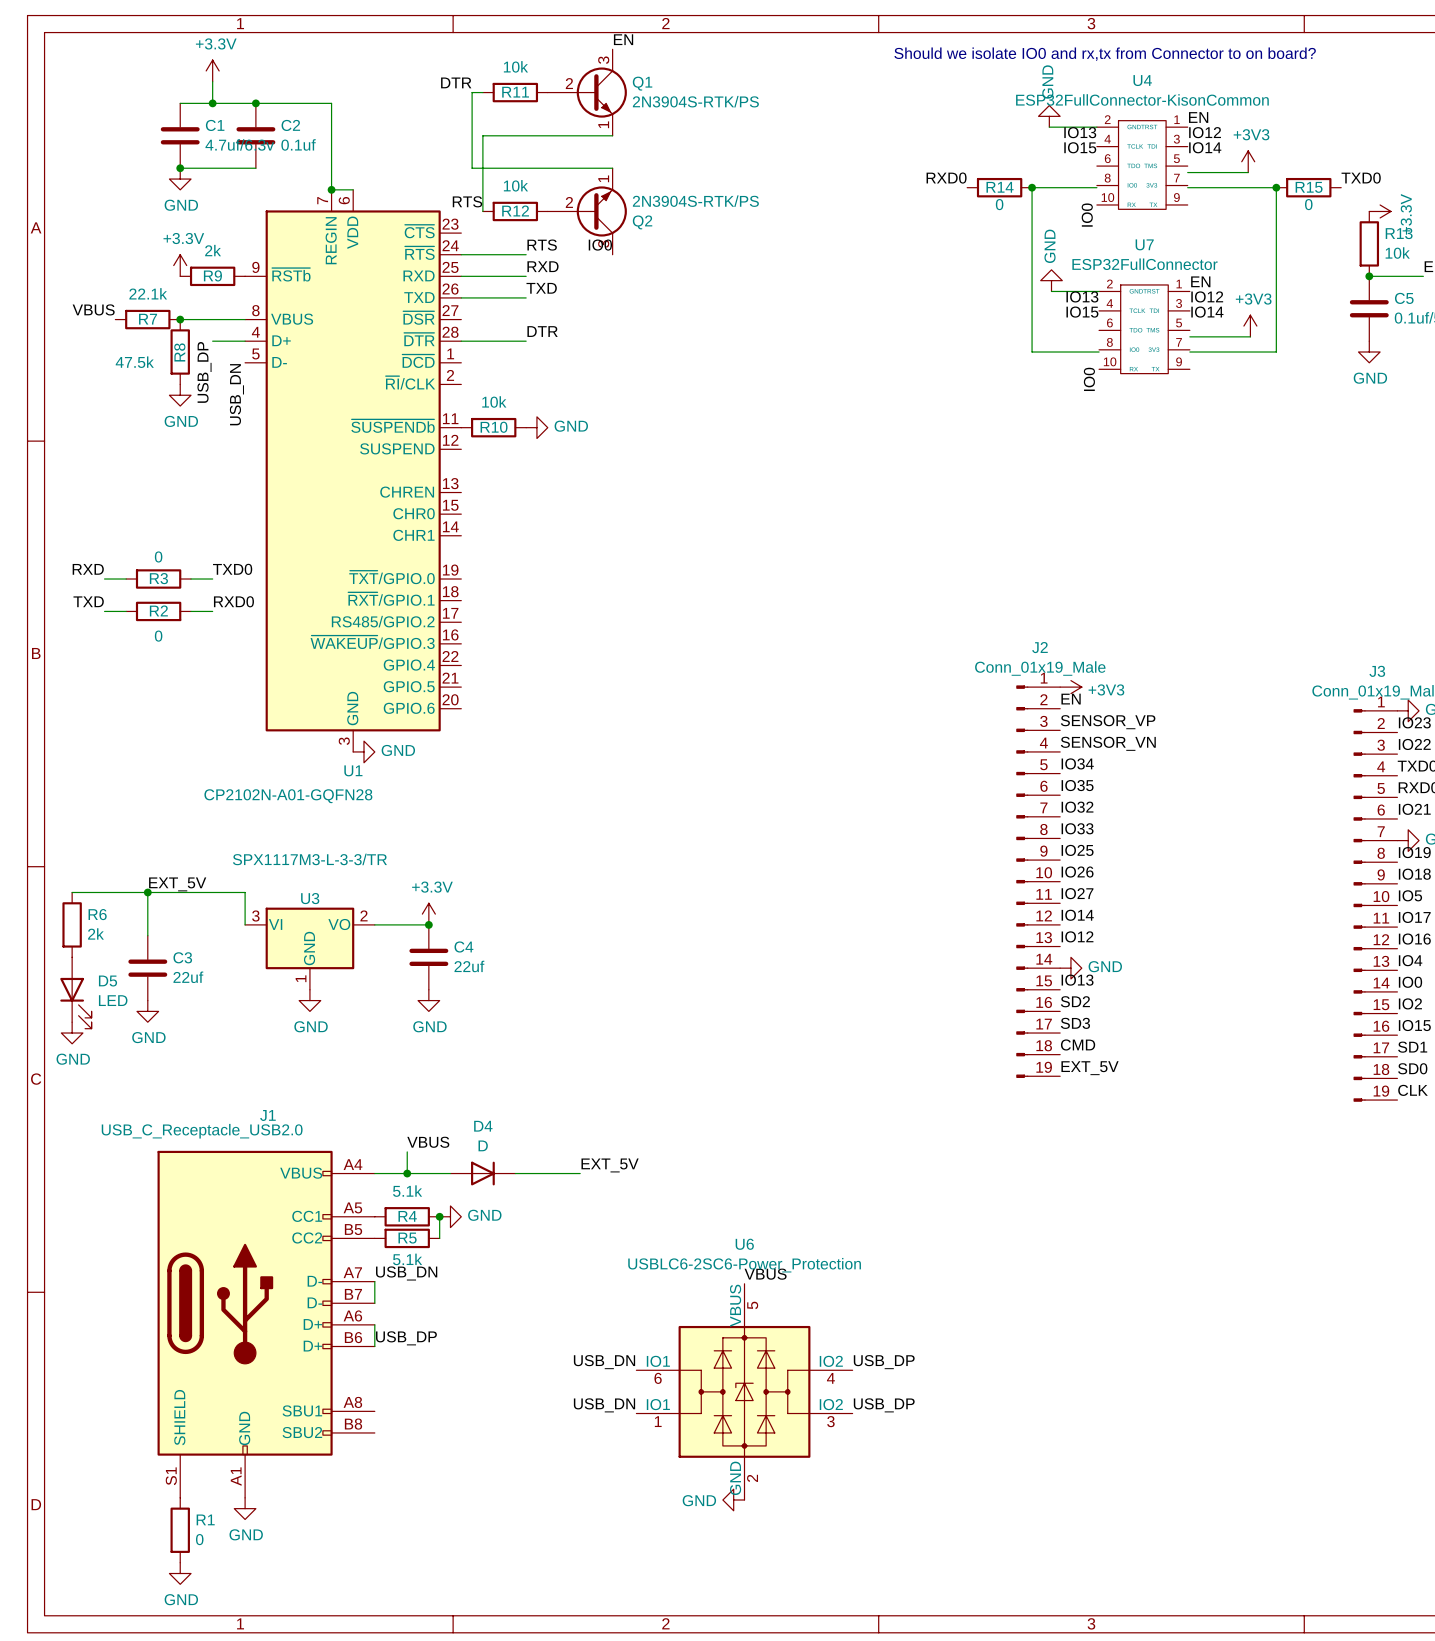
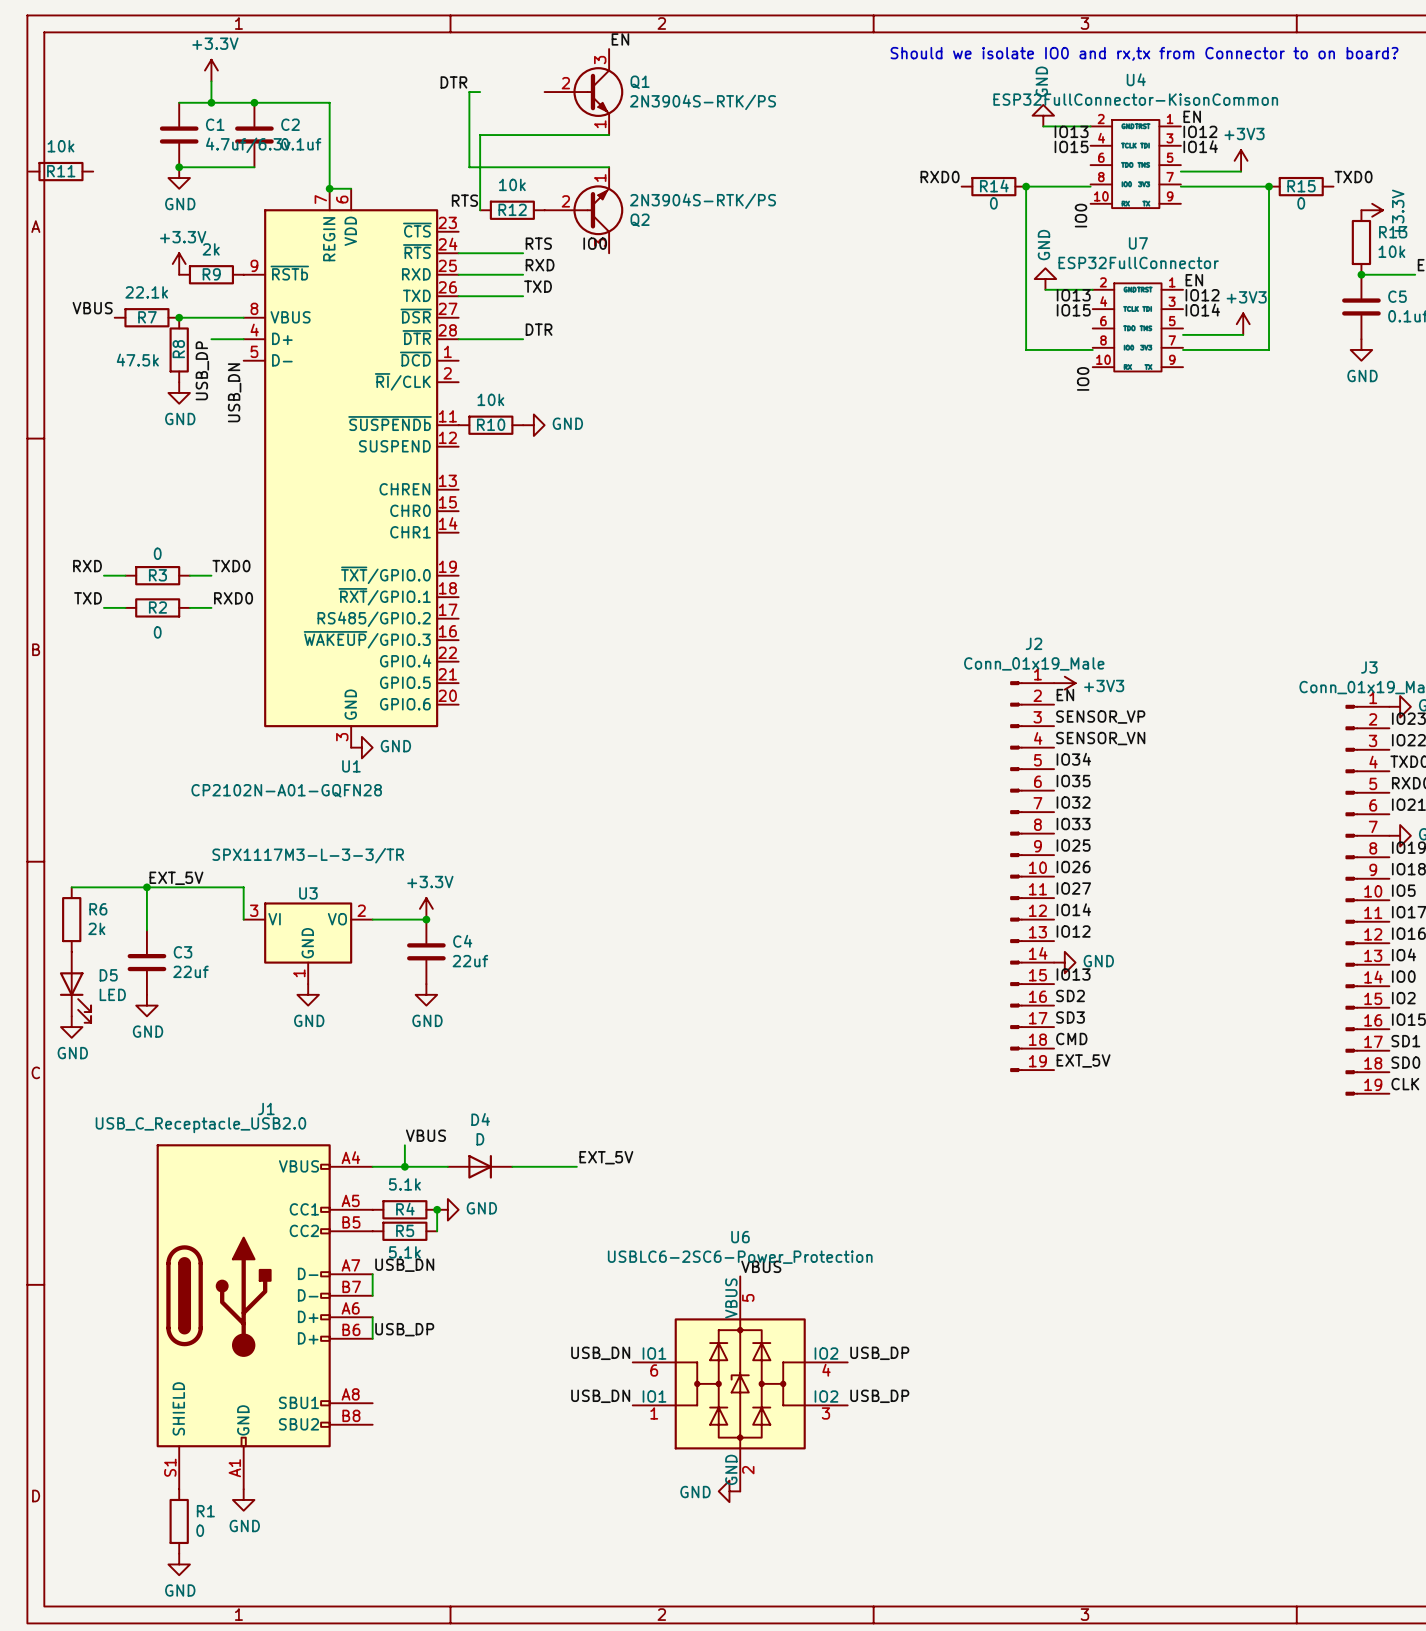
R11 position: (515, 92) -> (60, 171)

